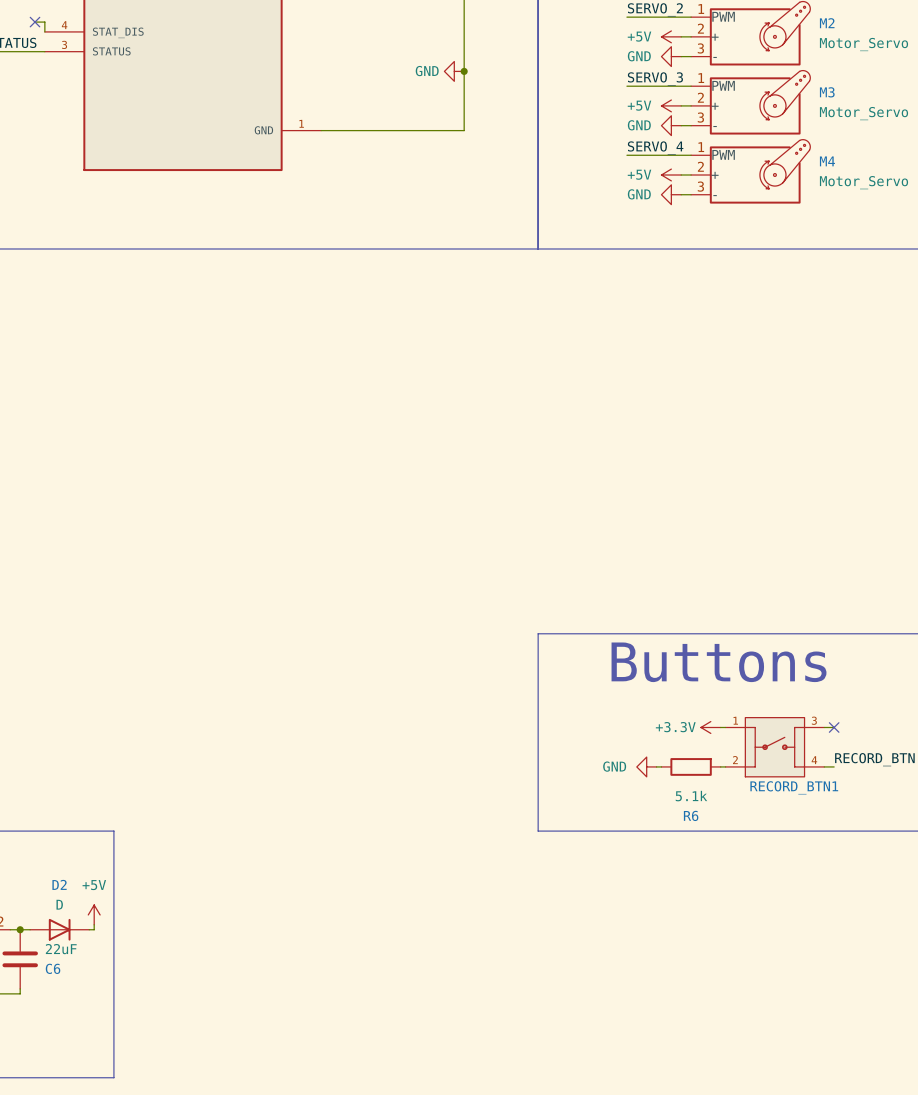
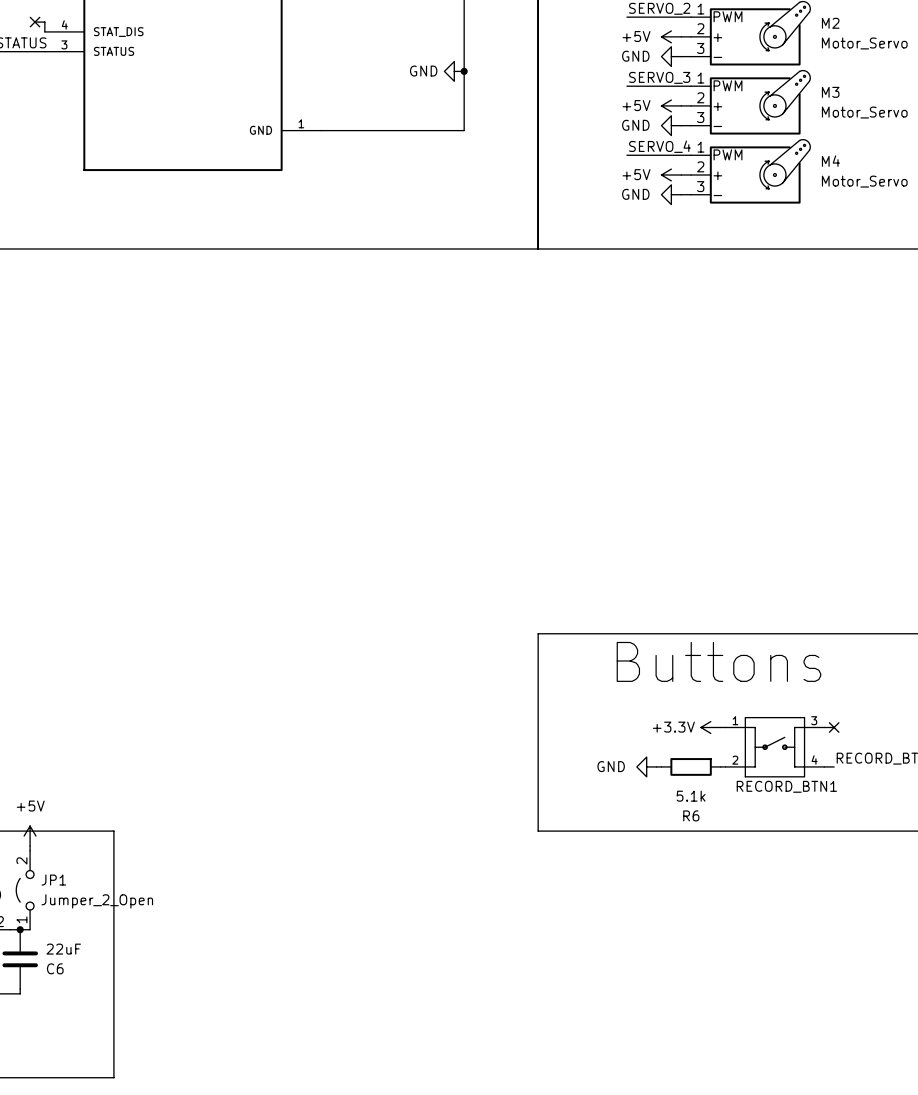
power symbol: none -> +5V (30, 836)
wire: none -> (30, 845) (30, 850)
JP1: none -> Jumper_2_Open (25, 890)
power symbol: +5V (94, 914) -> none
wire: (94, 924) (94, 929) (89, 929) -> none
D2: D (59, 929) -> none

